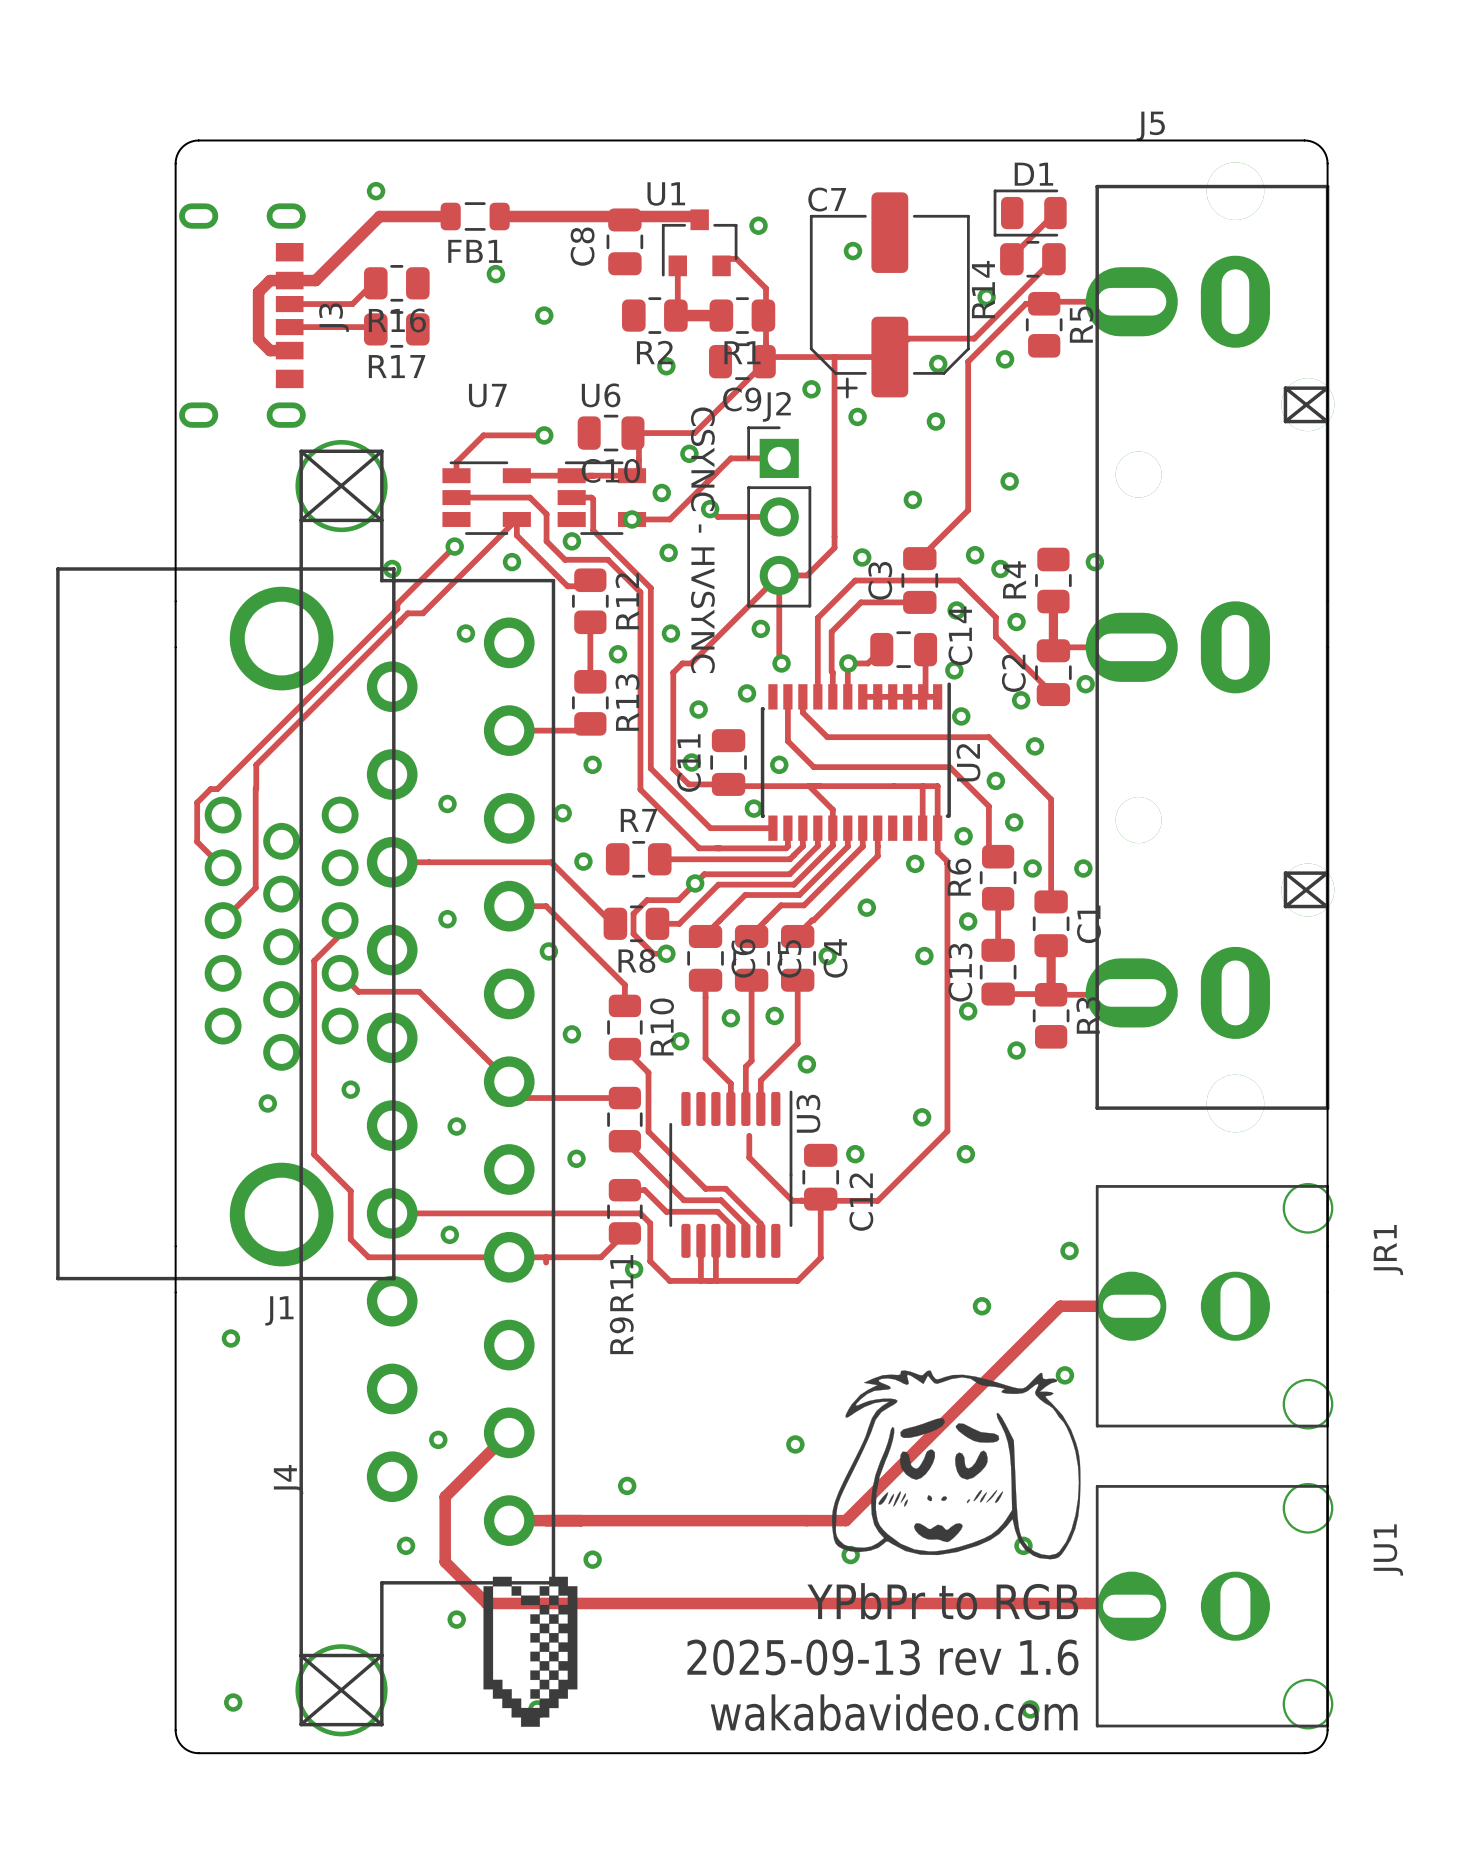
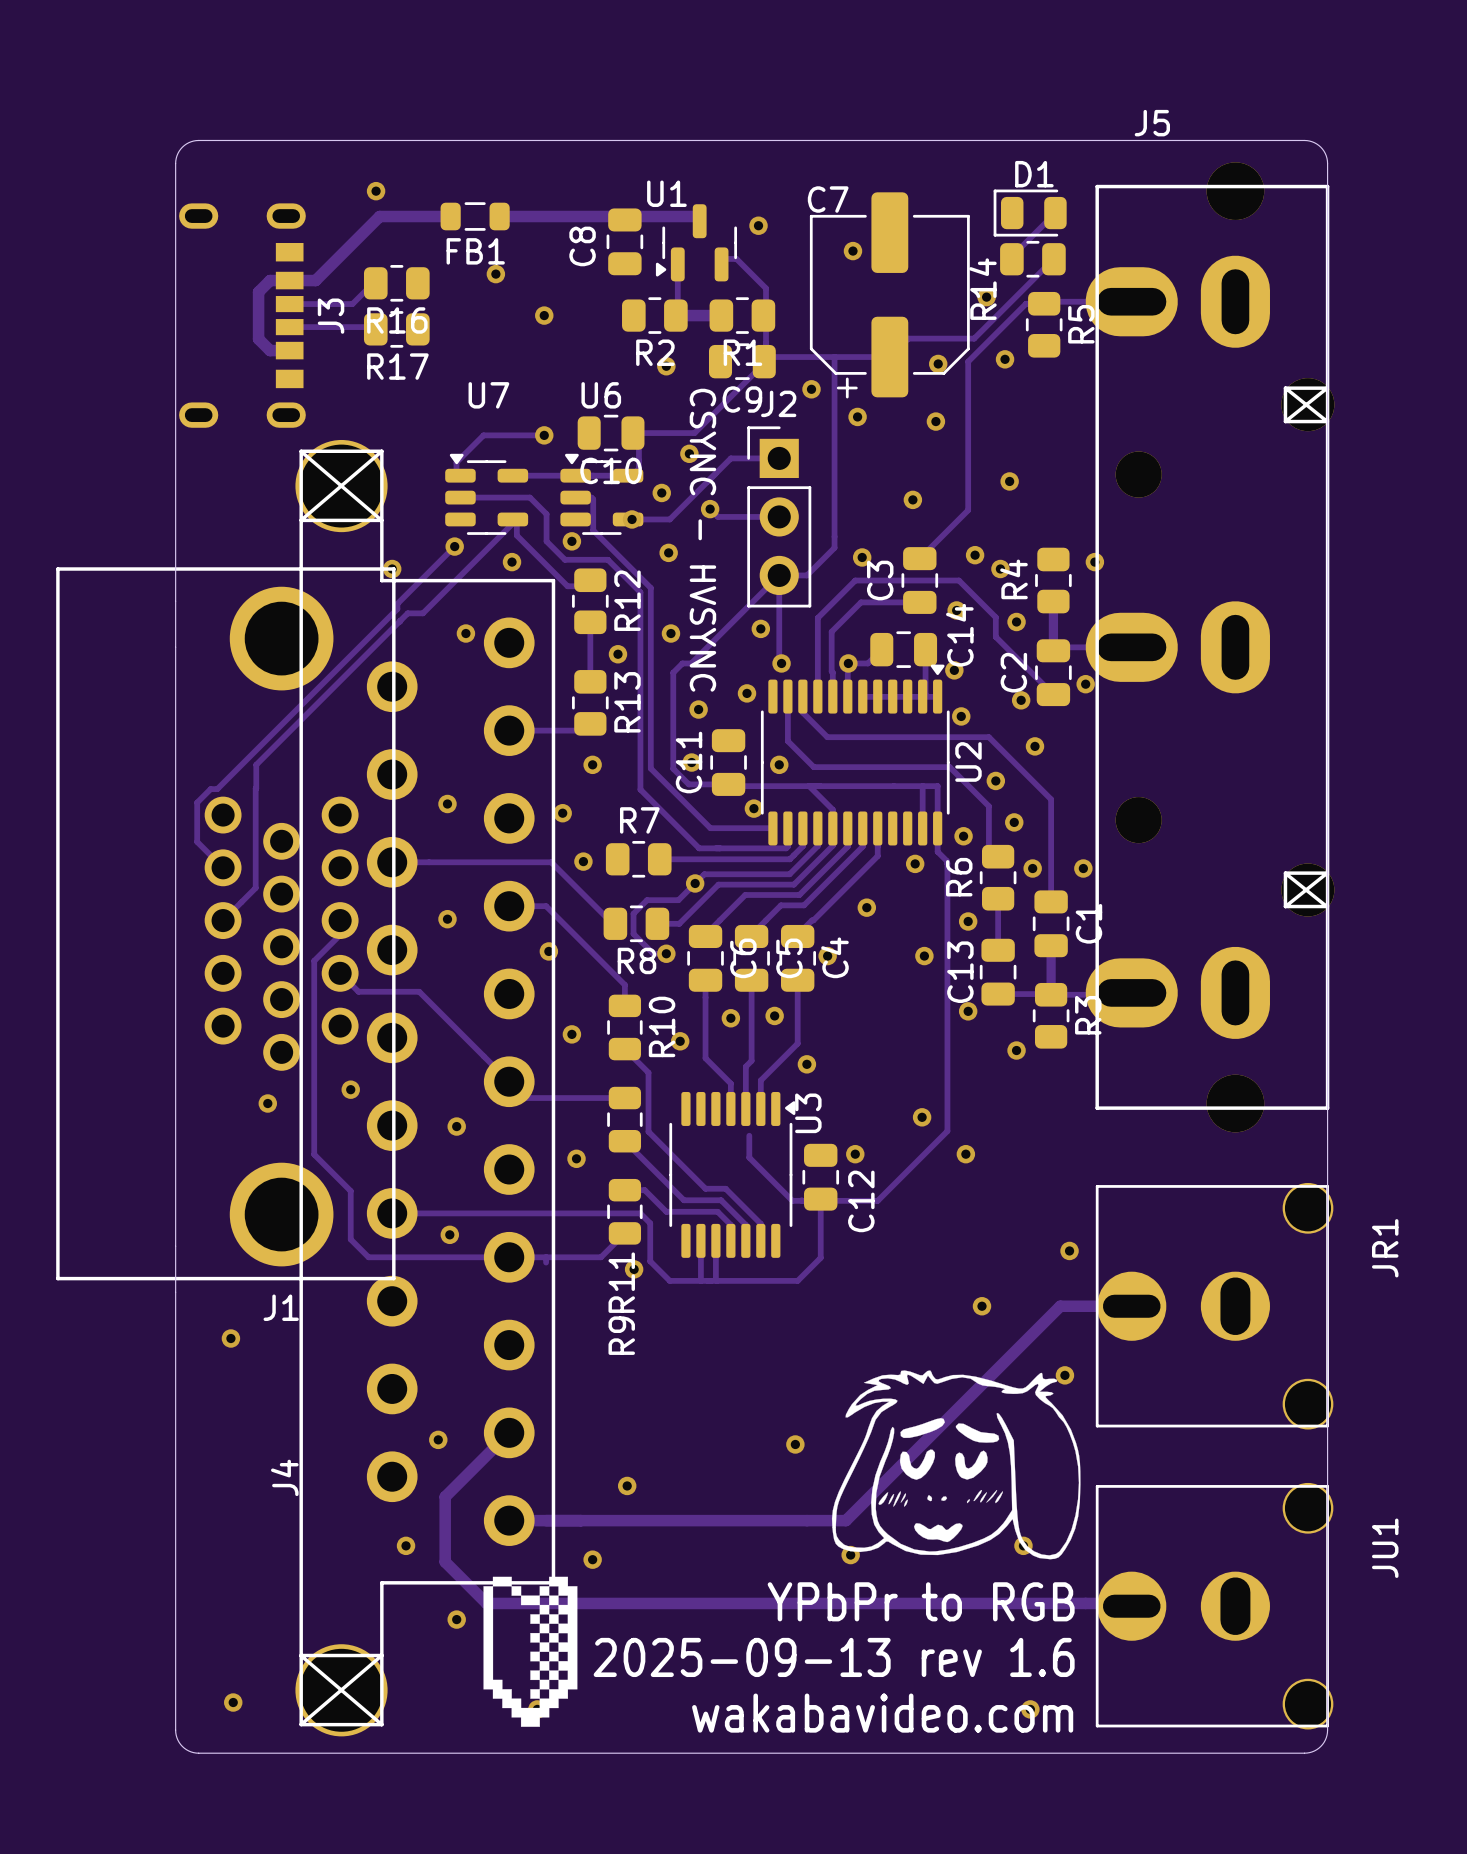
U1 footprint: [661, 209, 738, 277] -> [655, 204, 738, 282]
U7 footprint: [442, 461, 531, 535] -> [445, 453, 529, 535]
U6 footprint: [557, 461, 647, 535] -> [560, 453, 644, 535]
U2 footprint: [760, 682, 951, 841] -> [760, 664, 950, 846]
U3 footprint: [669, 1090, 793, 1258] -> [669, 1091, 796, 1258]

